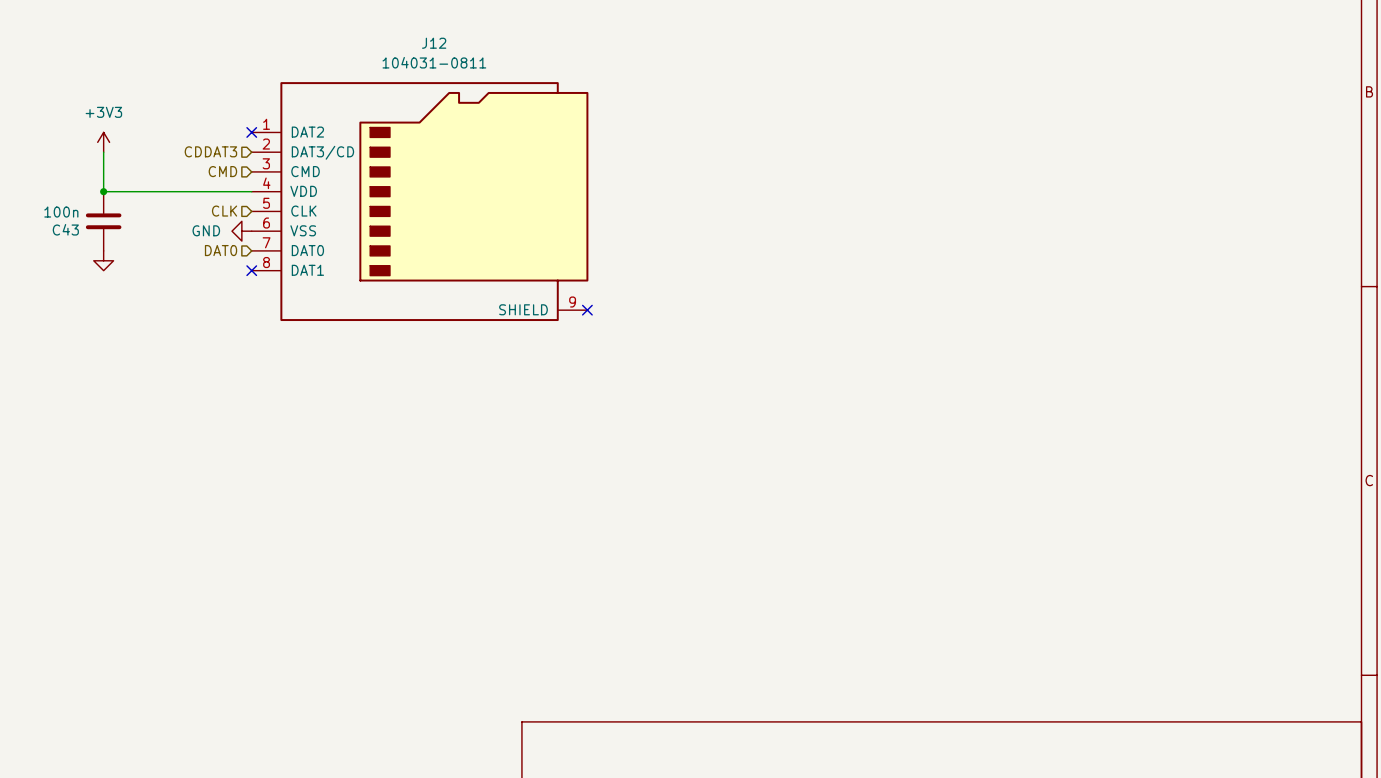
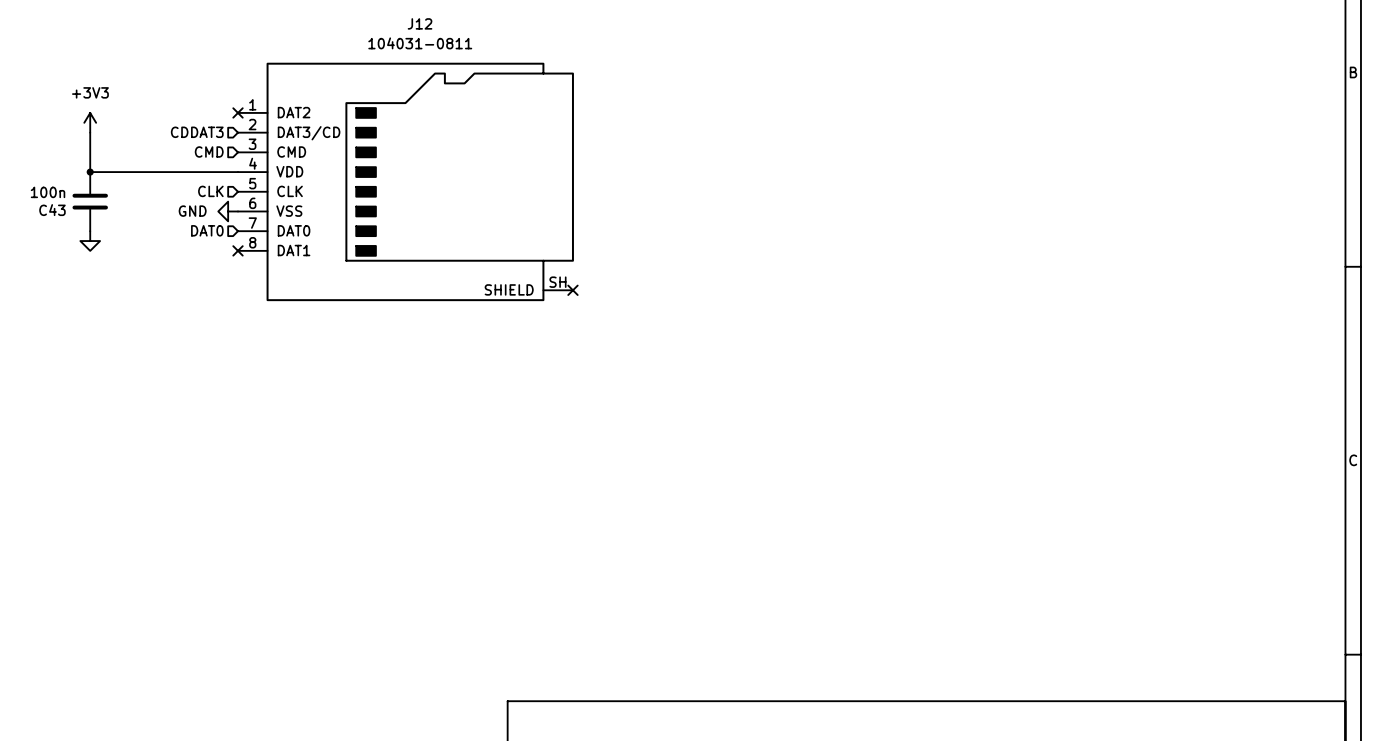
J12 pin number: 9 (572, 302) -> SH (557, 282)

